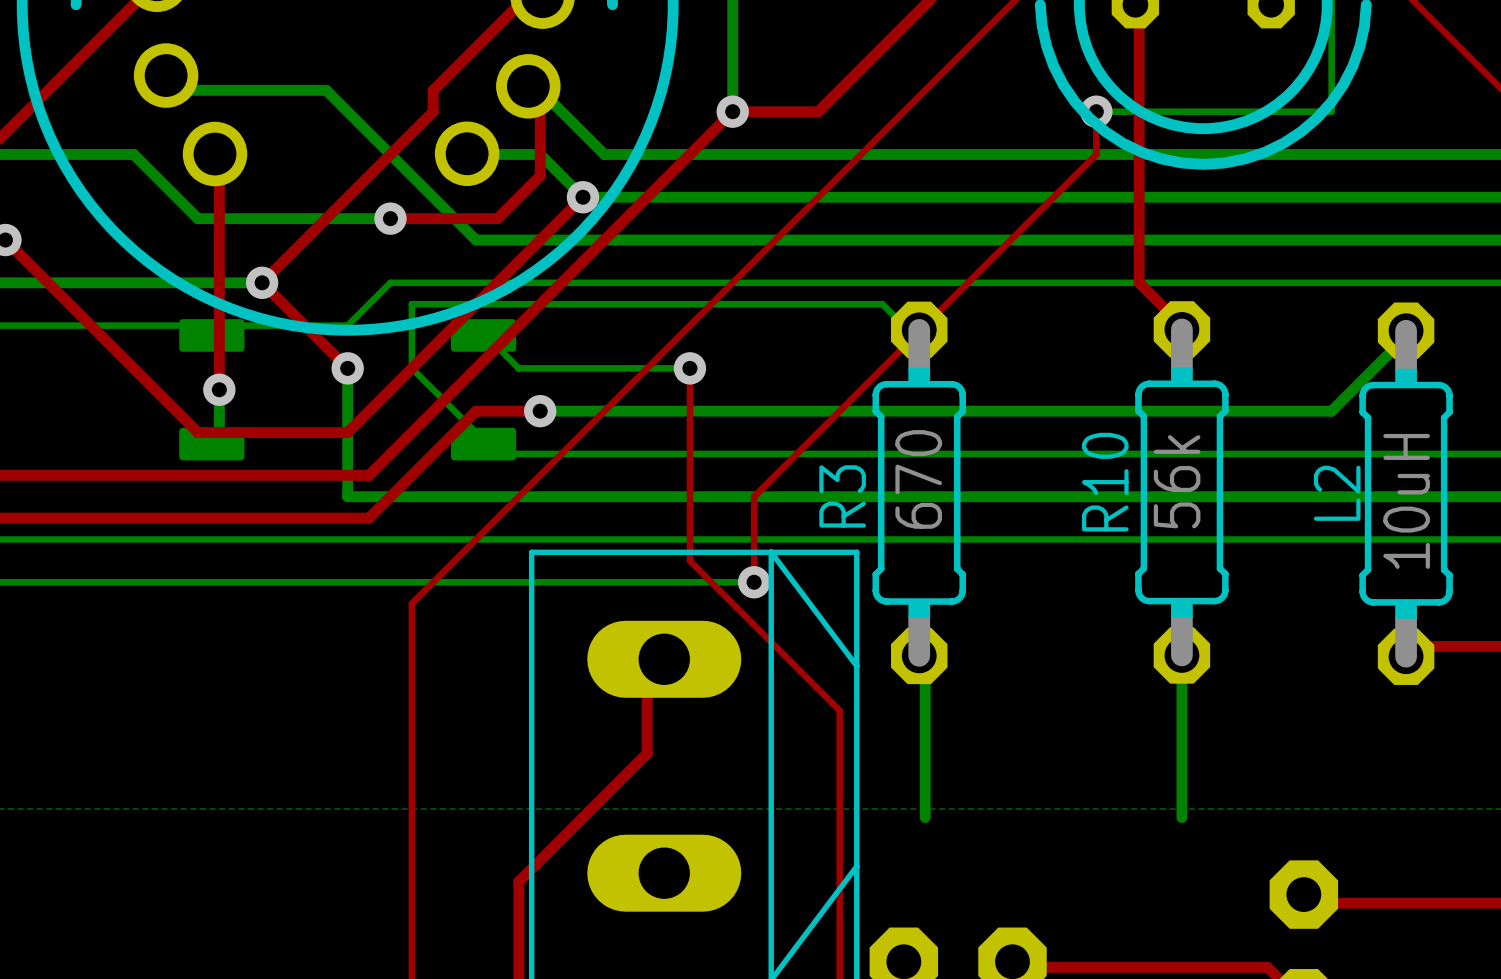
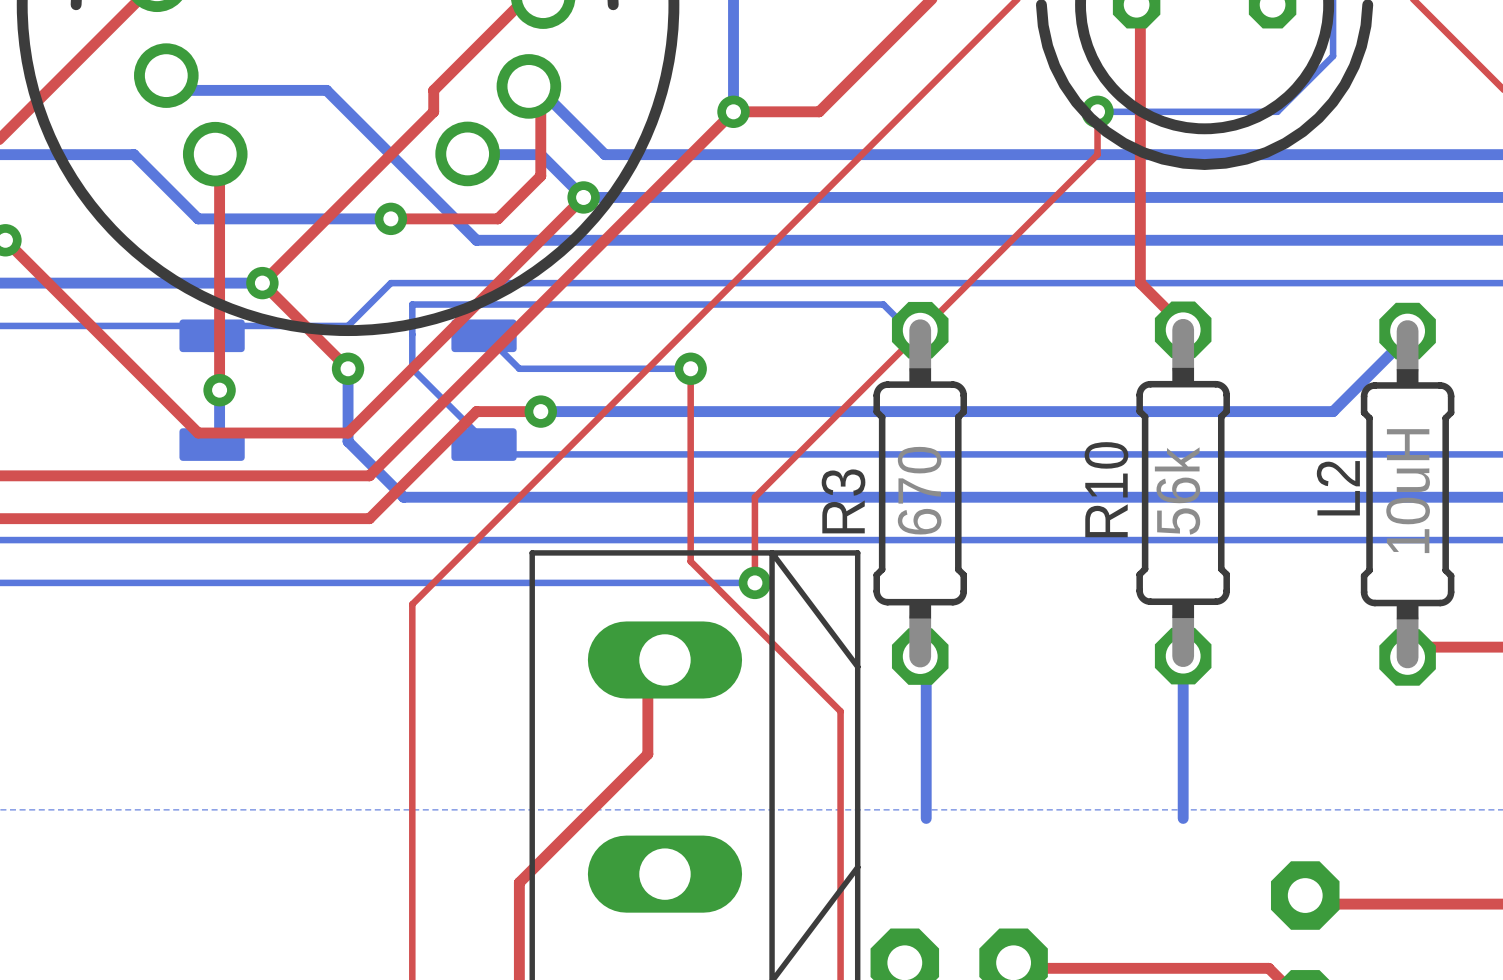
bottom track: (1331, 56) (1331, 111) (1276, 111) -> (1333, 56) (1277, 111)
bottom track: (347, 441) (347, 496) (403, 496) -> (348, 441) (403, 497)

